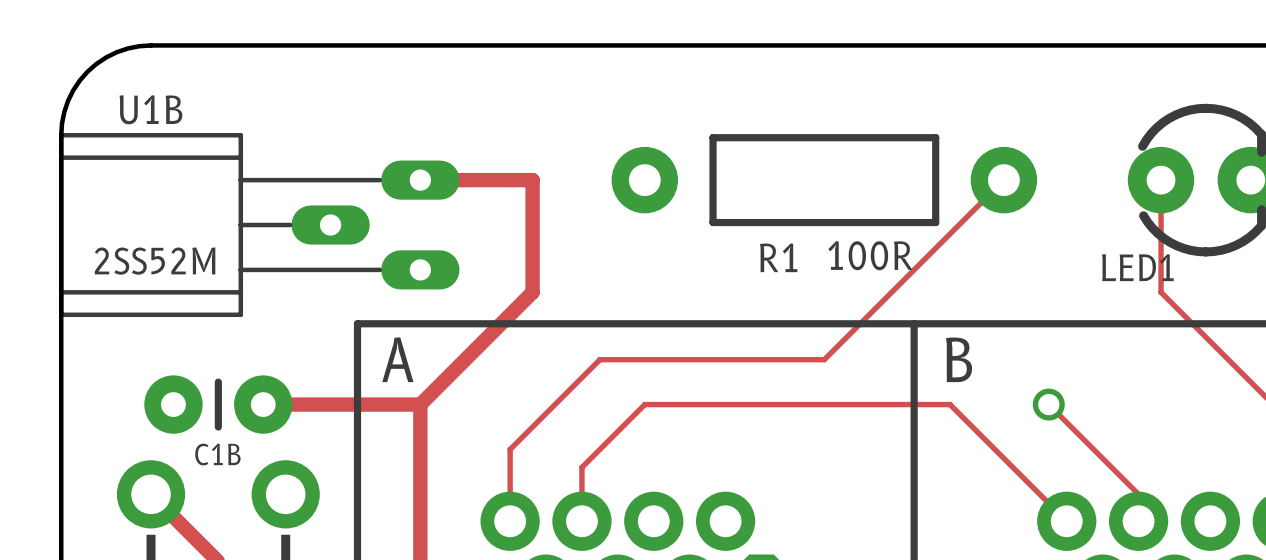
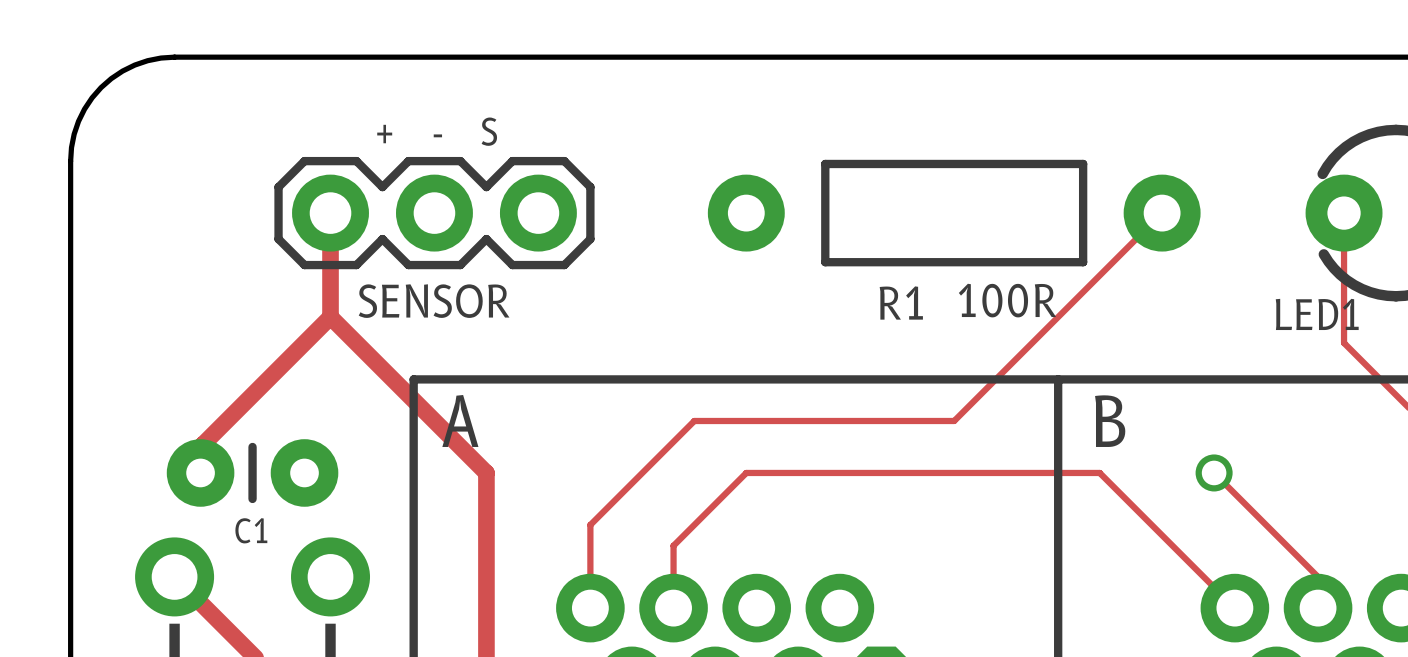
text: none -> + - S (437, 131)
track: none -> (330, 213) (330, 317)
part: none -> (434, 213)
track: (420, 180) (532, 180) (532, 292) (420, 404) (263, 404) -> none
part: (259, 225) -> none
track: none -> (330, 317) (486, 472)
track: none -> (330, 317) (203, 444) (203, 472)
part text: C1B (217, 454) -> C1 (251, 530)

